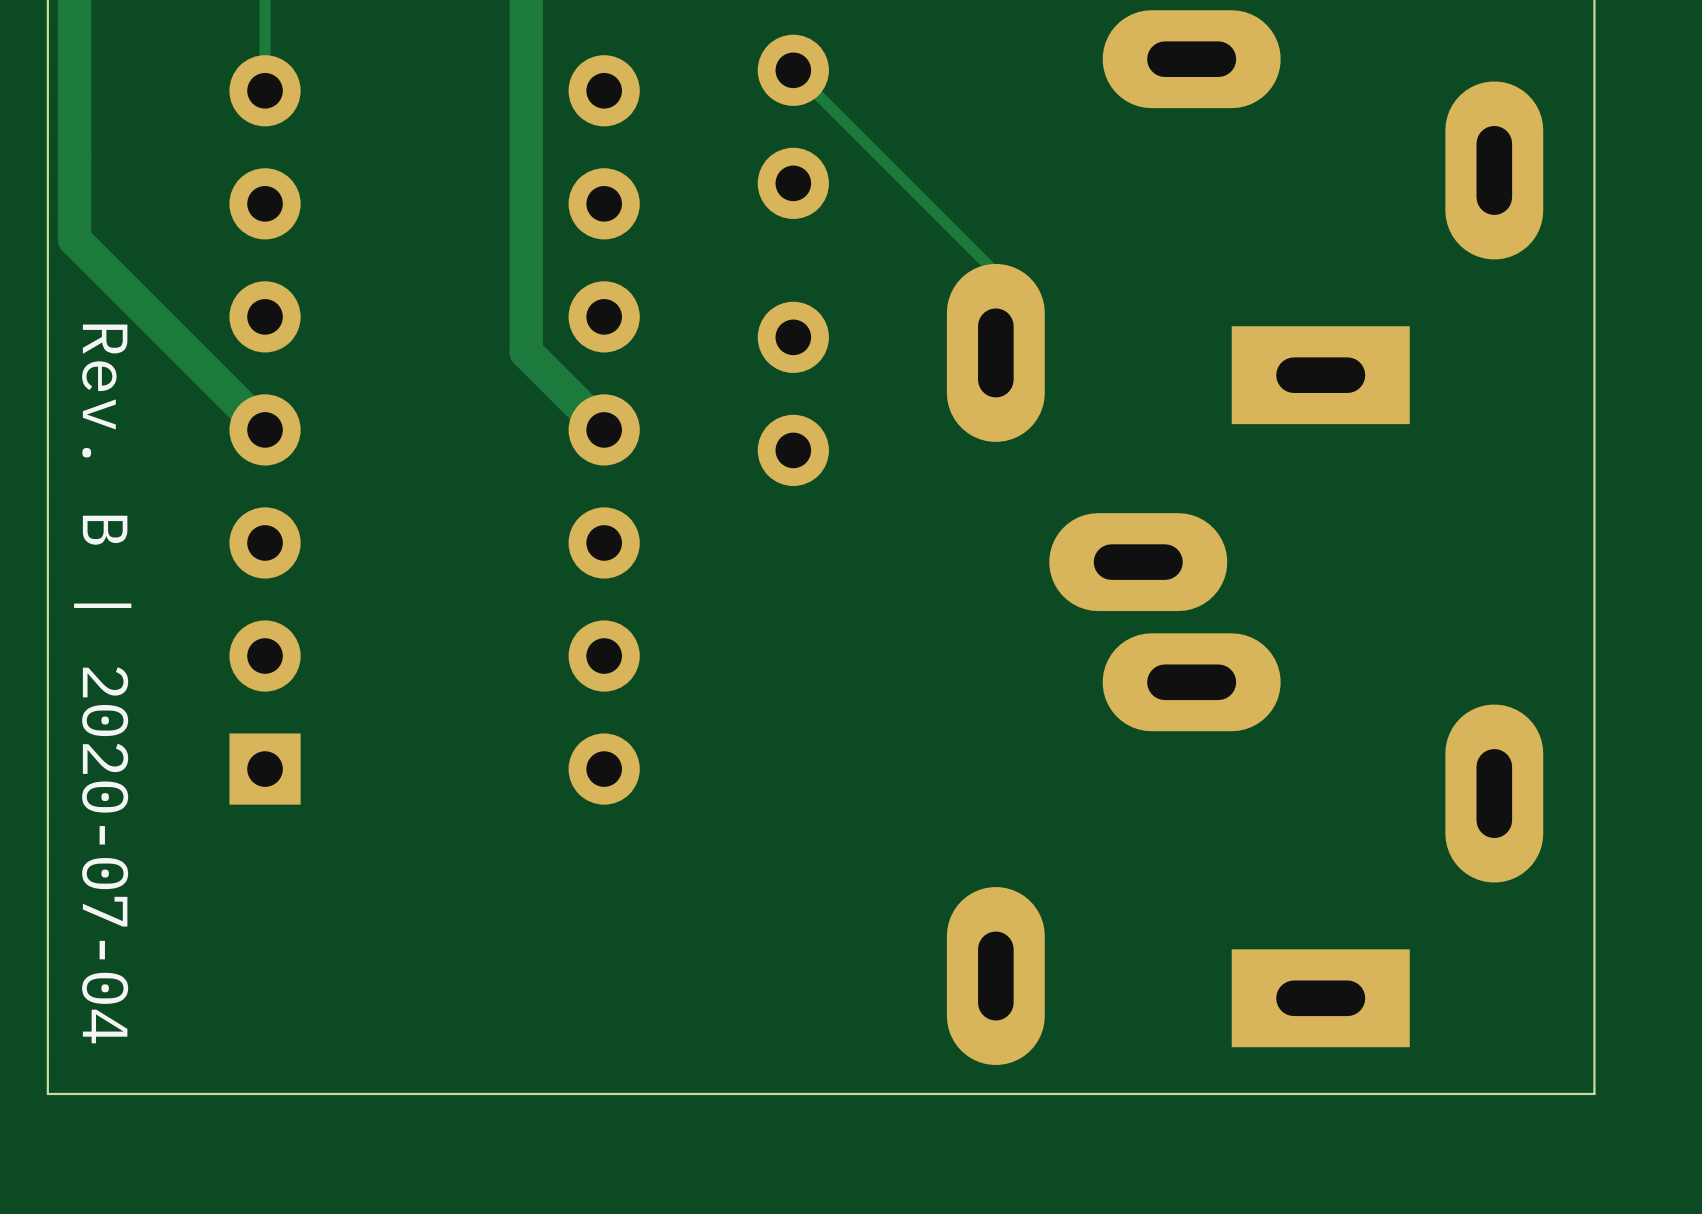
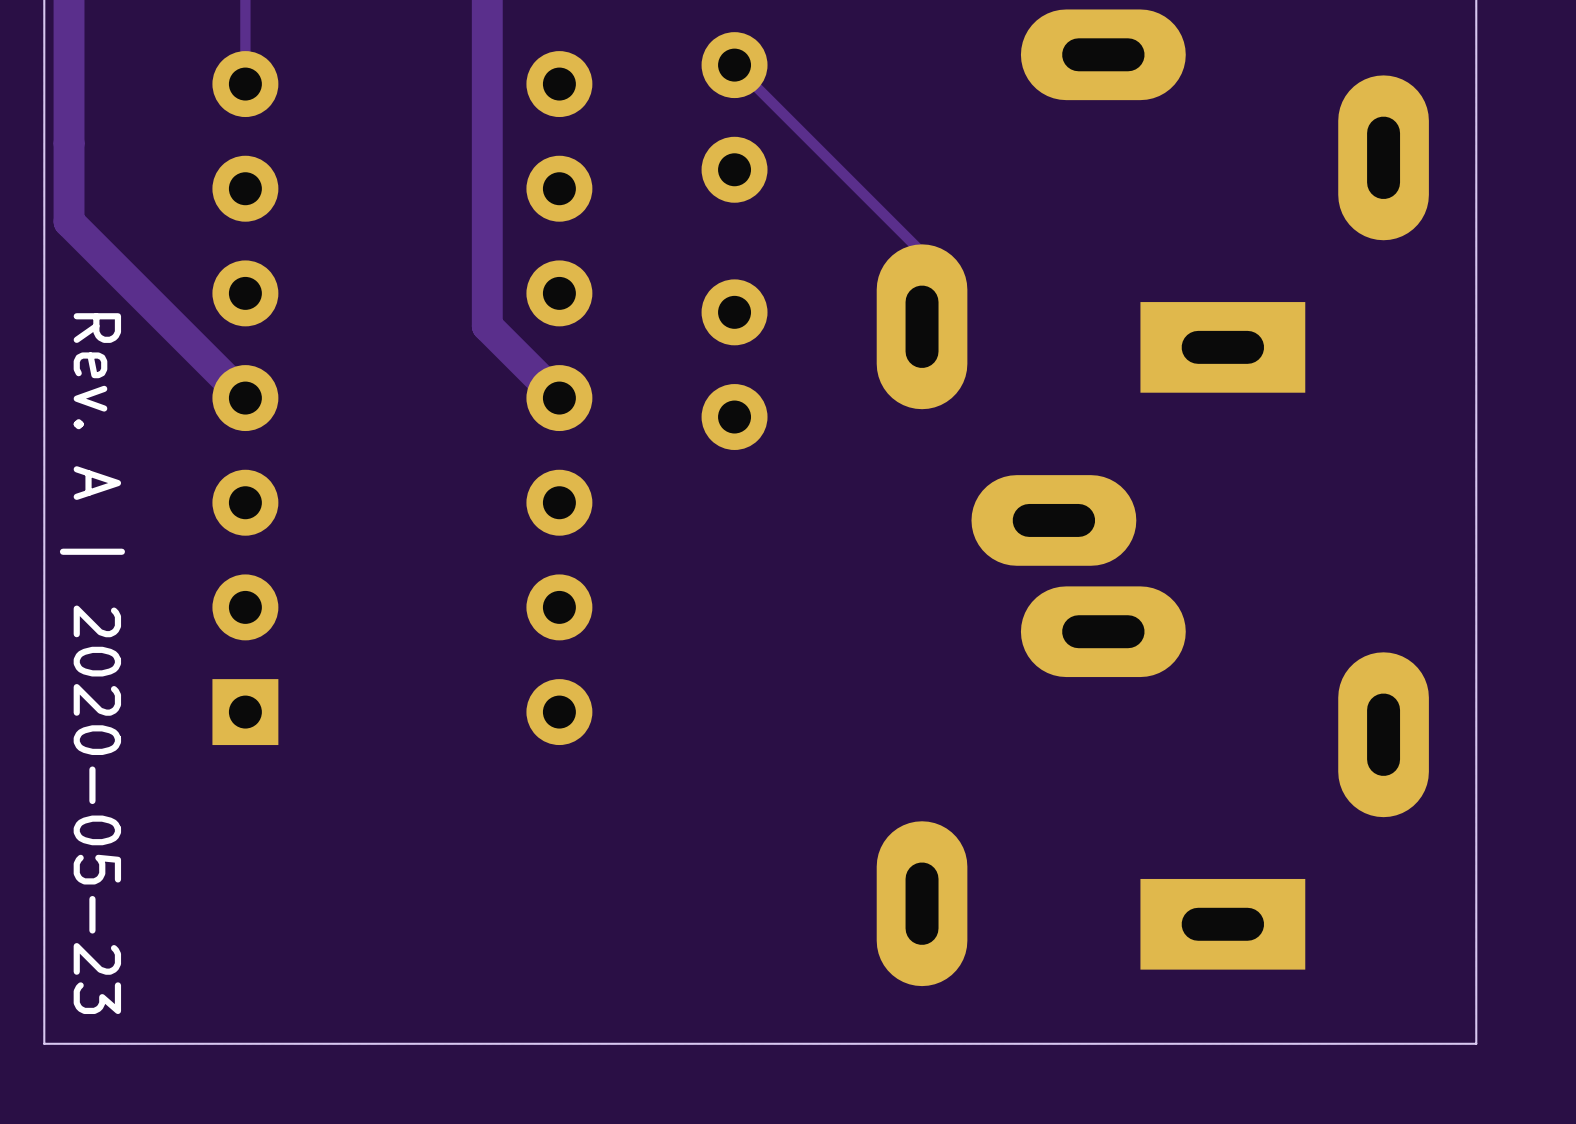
text: Rev. B | 2020-07-04 (102, 683) -> Rev. A | 2020-05-23 (92, 663)
board edge: (1594, 1093) (47, 1093) -> (1476, 1012) (1476, 1043) (44, 1043) (44, 1012)

